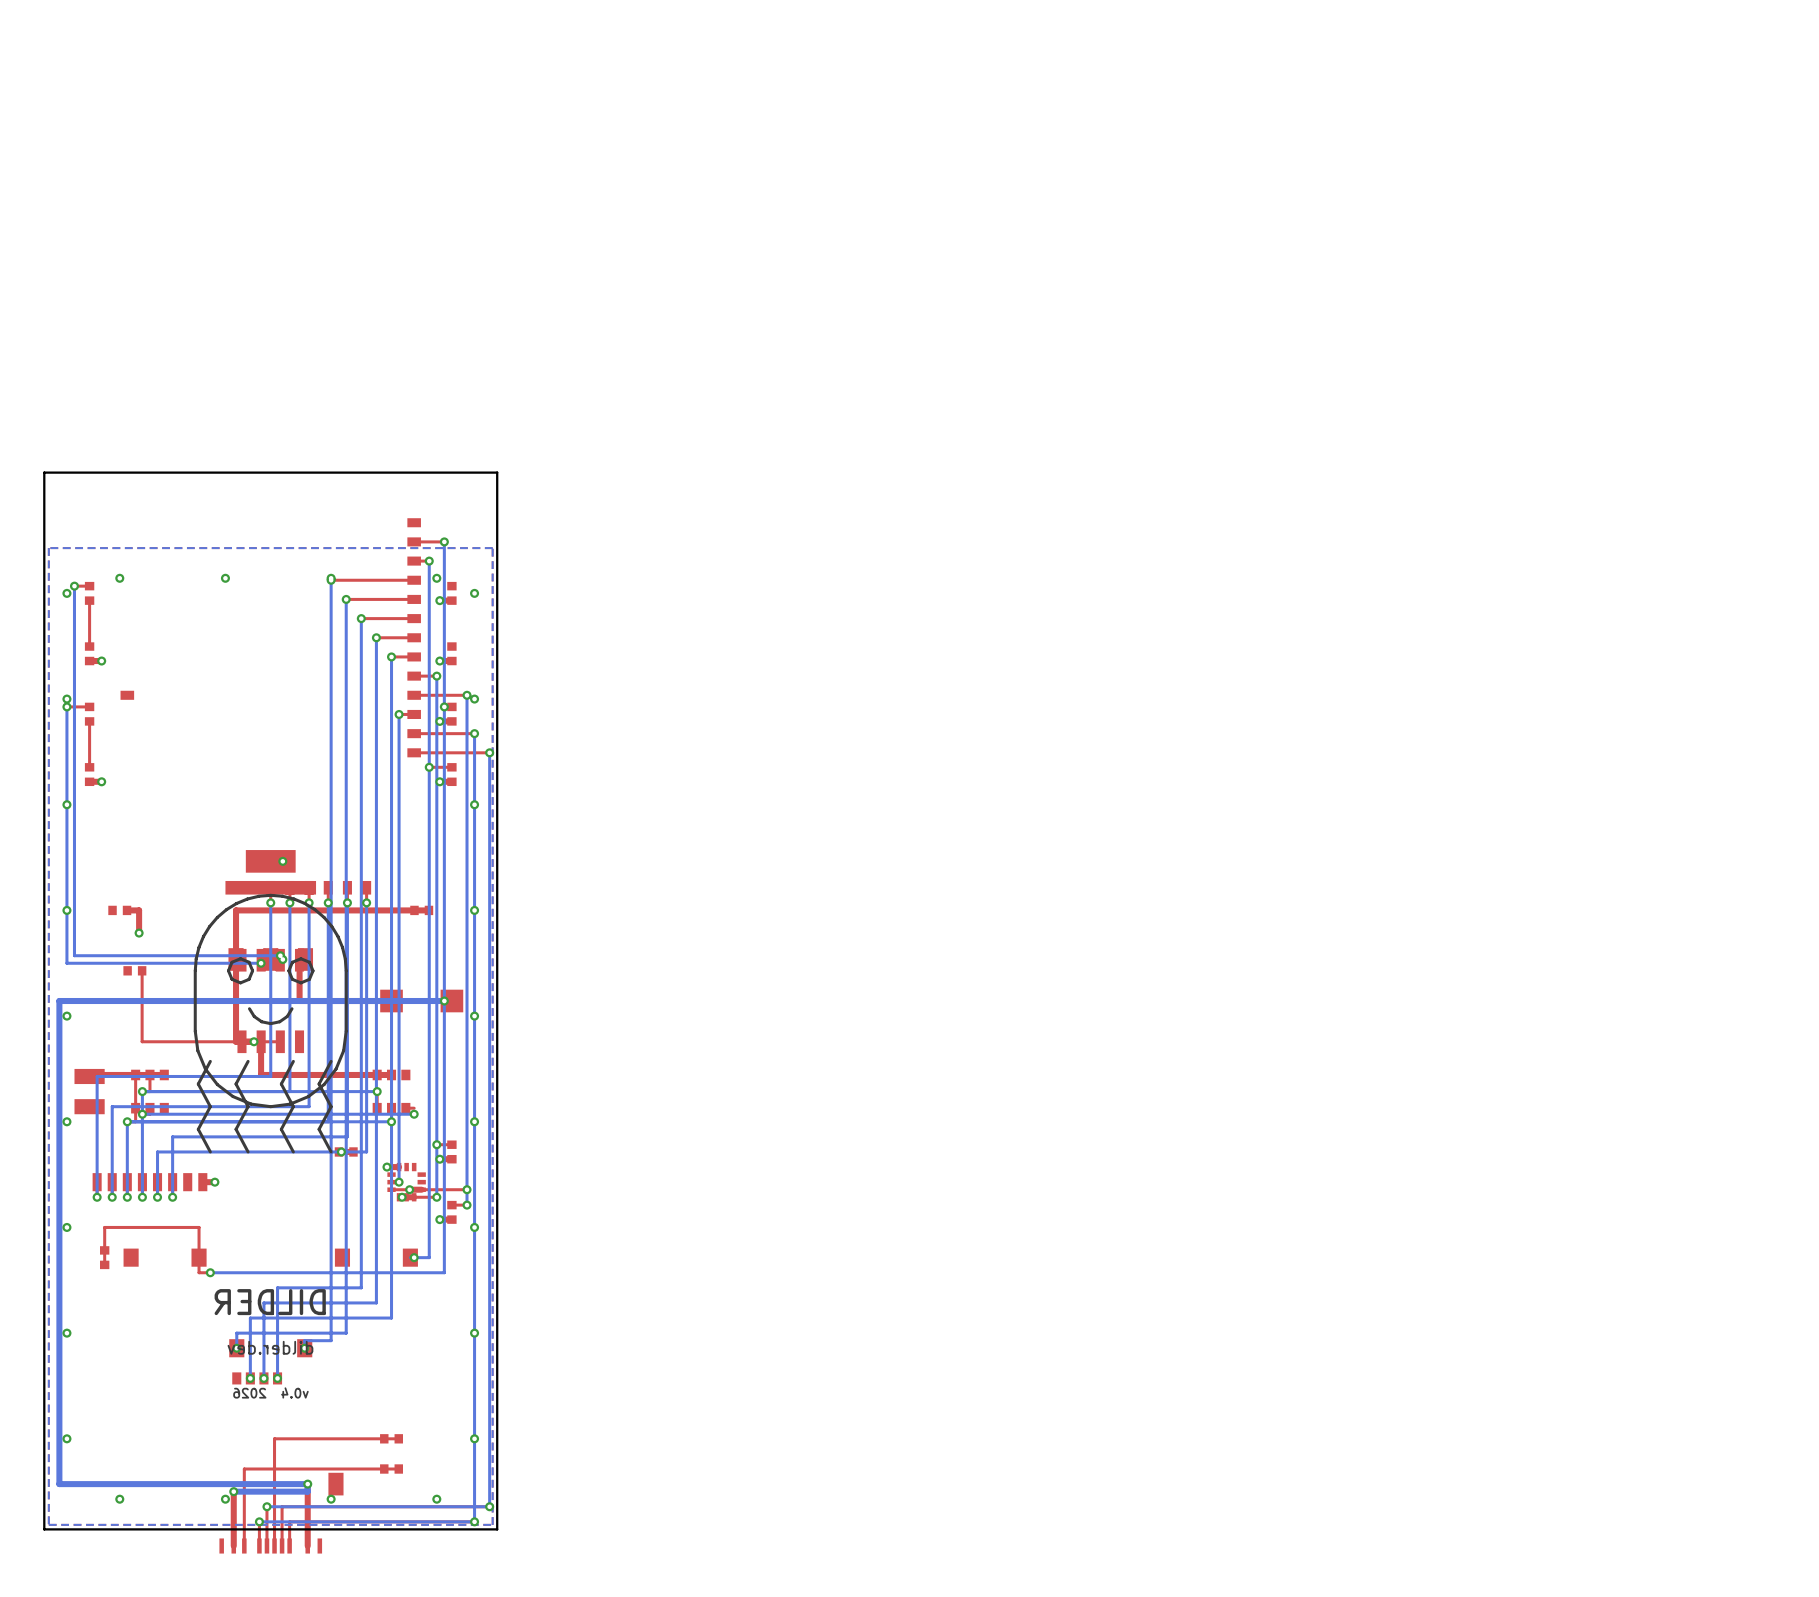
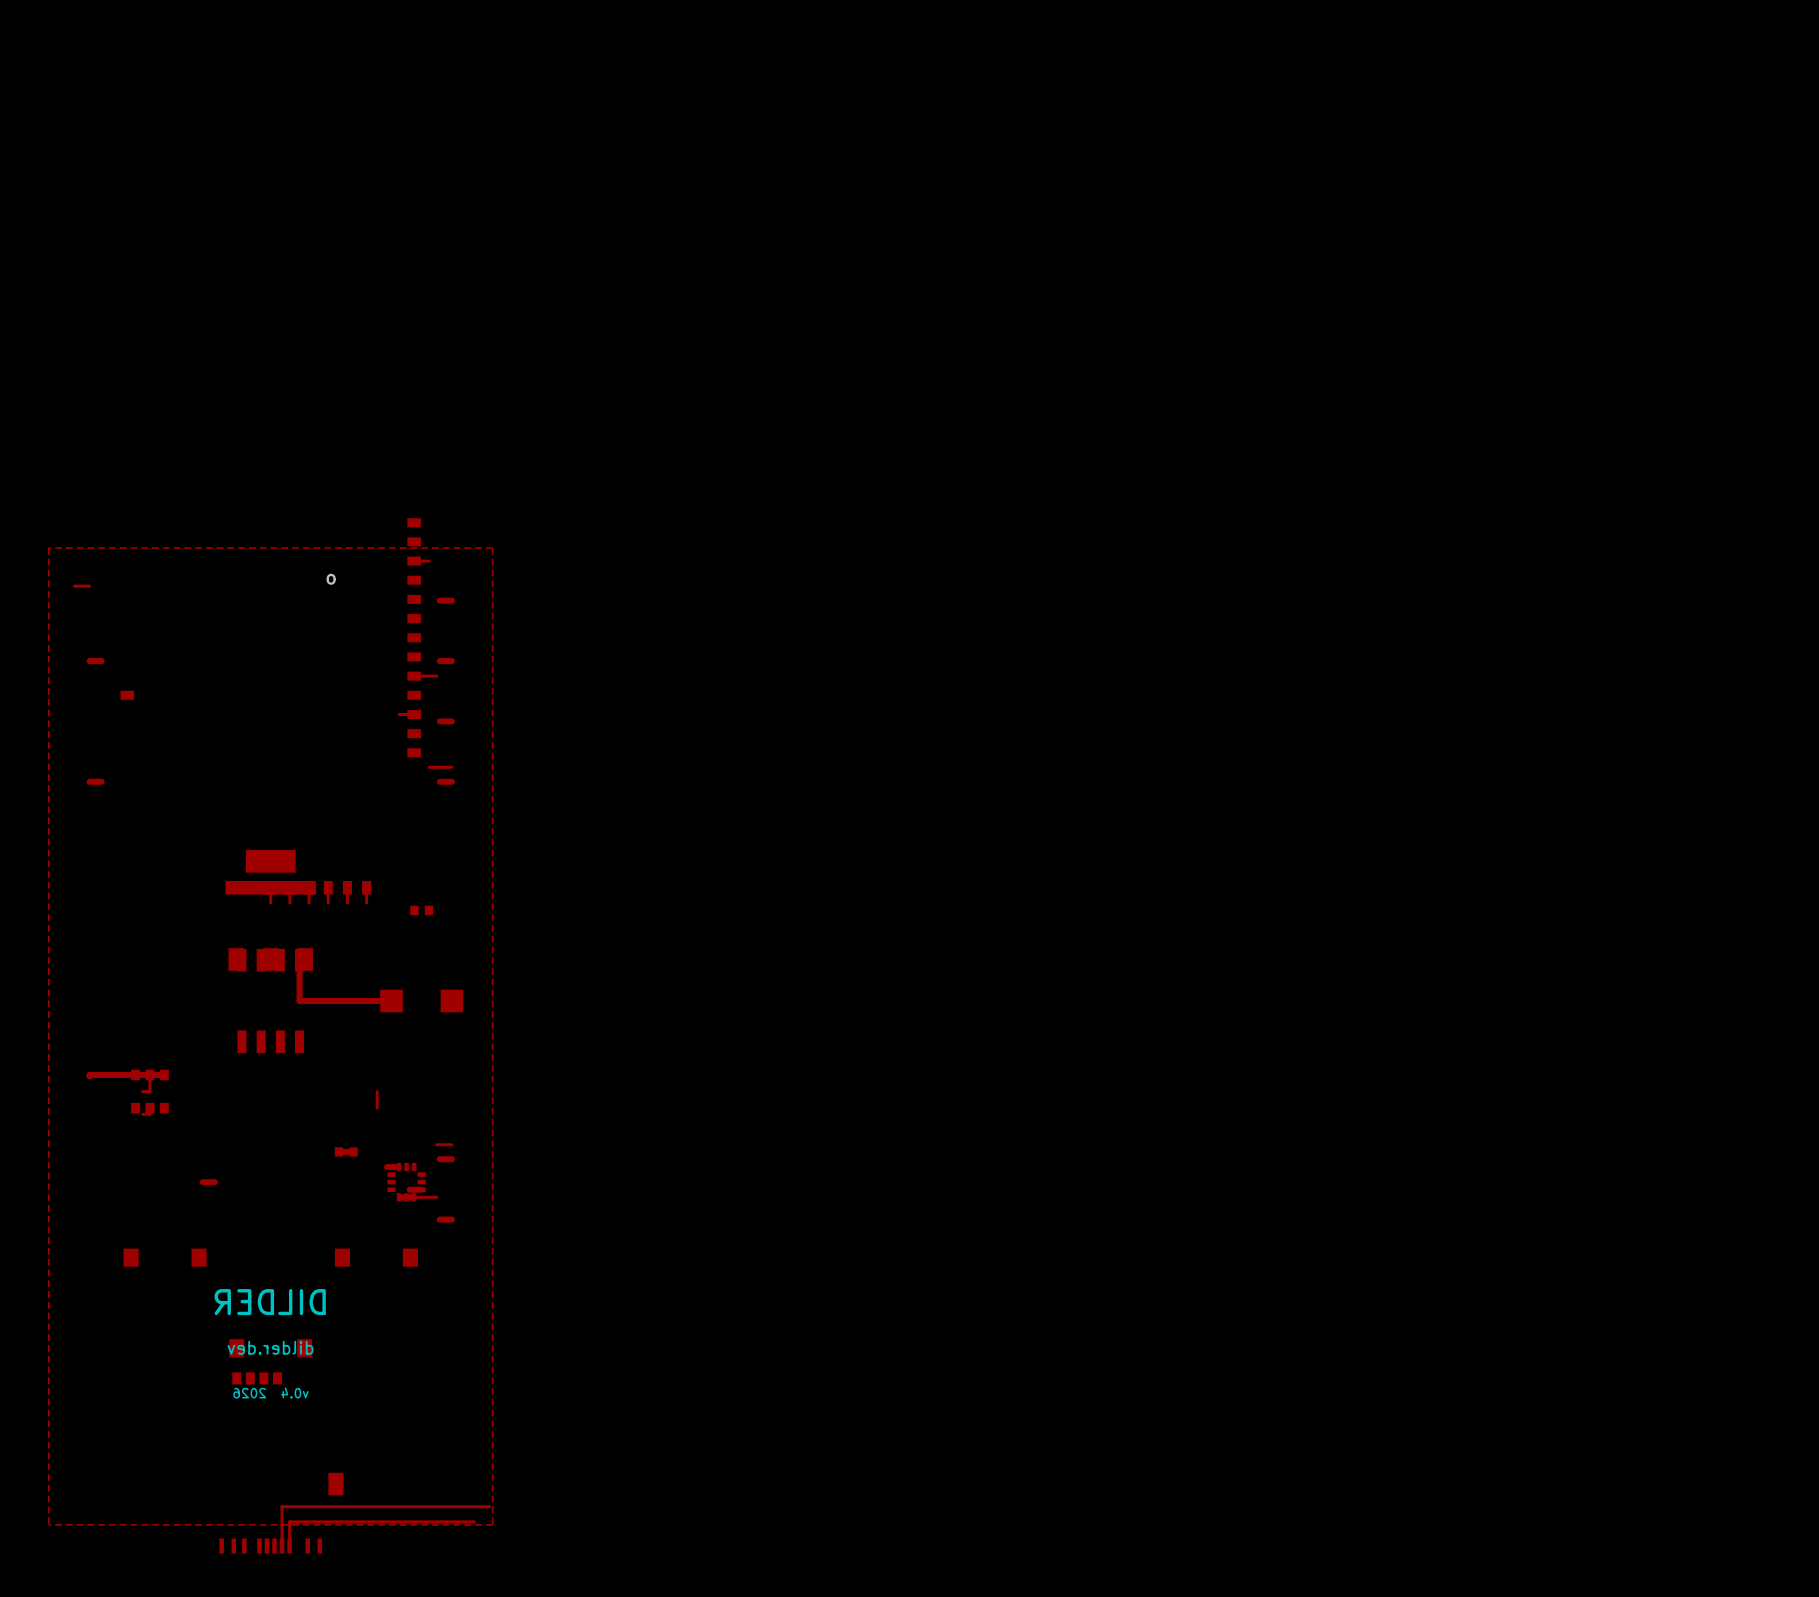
board edge: (497, 472) (44, 472) (44, 1529) (497, 1529) (497, 472) -> none
top track: (444, 541) (414, 541) -> none
bottom track: (444, 541) (444, 1272) (210, 1272) -> none
via: (444, 541) -> none
bottom zone outline: (492, 548) (48, 548) (48, 1524) (492, 1524) (492, 548) -> none
bottom track: (429, 561) (429, 1257) (410, 1257) -> none
via: (429, 561) -> none
via: (119, 578) -> none
via: (225, 578) -> none
via: (436, 578) -> none
bottom track: (331, 580) (331, 1340) (304, 1340) (304, 1348) -> none
top track: (414, 580) (331, 580) -> none
bottom track: (74, 586) (74, 955) (280, 955) -> none
via: (74, 586) -> none
via: (66, 593) -> none
part: (89, 593) -> none
part: (451, 593) -> none
via: (474, 593) -> none
bottom track: (346, 599) (346, 1333) (236, 1333) (236, 1348) -> none
via: (346, 599) -> none
top track: (414, 599) (346, 599) -> none
top track: (89, 600) (89, 646) -> none
via: (439, 600) -> none
bottom track: (361, 618) (361, 1287) (277, 1287) (277, 1378) -> none
via: (361, 618) -> none
top track: (414, 618) (361, 618) -> none
bottom track: (376, 637) (376, 1302) (263, 1302) (263, 1378) -> none
via: (376, 637) -> none
top track: (414, 637) (376, 637) -> none
part: (89, 653) -> none
part: (451, 653) -> none
bottom track: (391, 656) (391, 1318) (250, 1318) (250, 1378) -> none
via: (391, 656) -> none
top track: (414, 656) (391, 656) -> none
via: (101, 661) -> none
via: (439, 661) -> none
bottom track: (436, 676) (436, 1197) -> none
via: (436, 676) -> none
top track: (467, 695) (414, 695) -> none
bottom track: (467, 695) (467, 1205) -> none
via: (467, 695) -> none
via: (66, 699) -> none
via: (474, 699) -> none
bottom track: (66, 706) (66, 963) (261, 963) -> none
via: (66, 706) -> none
top track: (89, 706) (66, 706) -> none
via: (444, 706) -> none
part: (89, 714) -> none
bottom track: (399, 714) (399, 1182) -> none
via: (399, 714) -> none
part: (451, 714) -> none
top track: (89, 721) (89, 767) -> none
via: (439, 721) -> none
top track: (474, 733) (414, 733) -> none
bottom track: (474, 733) (474, 1521) (259, 1521) -> none
via: (474, 733) -> none
top track: (489, 752) (414, 752) -> none
bottom track: (489, 752) (489, 1506) (266, 1506) -> none
via: (489, 752) -> none
via: (429, 767) -> none
part: (89, 774) -> none
part: (451, 774) -> none
via: (101, 781) -> none
via: (439, 781) -> none
via: (66, 804) -> none
via: (474, 804) -> none
via: (282, 861) -> none
line: (270, 895) (282, 896) (305, 903) (324, 917) (338, 936) (345, 959) (346, 970) (346, 1031) (343, 1050) (336, 1068) (324, 1084) (308, 1096) (290, 1104) (270, 1106) (251, 1104) (233, 1096) (217, 1084) (205, 1068) (197, 1050) (195, 1031) (196, 959) (203, 936) (217, 917) (236, 903) (258, 896) (270, 895) -> none
bottom track: (270, 902) (270, 1076) (97, 1076) (97, 1197) -> none
via: (270, 902) -> none
bottom track: (289, 902) (289, 1091) -> none
via: (289, 902) -> none
bottom track: (309, 902) (309, 1106) (112, 1106) (112, 1197) -> none
via: (309, 902) -> none
bottom track: (328, 902) (328, 1121) -> none
via: (328, 902) -> none
bottom track: (347, 902) (347, 1136) (172, 1136) (172, 1197) -> none
via: (347, 902) -> none
bottom track: (366, 902) (366, 1151) (157, 1151) (157, 1197) -> none
via: (366, 902) -> none
via: (66, 910) -> none
part: (119, 910) -> none
top track: (127, 910) (139, 910) (139, 933) -> none
top track: (428, 910) (236, 910) (236, 1041) (261, 1041) (261, 1074) (391, 1074) -> none
via: (474, 910) -> none
via: (139, 933) -> none
via: (280, 955) -> none
line: (240, 958) (249, 962) (252, 970) (249, 979) (240, 982) (232, 979) (228, 970) (232, 962) (240, 958) -> none
line: (300, 958) (309, 962) (313, 970) (309, 979) (300, 982) (292, 979) (288, 970) (292, 962) (300, 958) -> none
via: (282, 959) -> none
via: (261, 963) -> none
part: (134, 970) -> none
top track: (142, 970) (142, 1041) (280, 1041) -> none
bottom track: (444, 1001) (59, 1001) (59, 1484) (307, 1484) (307, 1491) (233, 1491) -> none
via: (444, 1001) -> none
line: (292, 1008) (287, 1016) (279, 1021) (270, 1023) (261, 1021) (254, 1016) (249, 1008) -> none
via: (66, 1016) -> none
via: (474, 1016) -> none
via: (253, 1041) -> none
line: (210, 1061) (198, 1084) (210, 1106) (198, 1129) (210, 1151) -> none
line: (248, 1061) (236, 1084) (248, 1106) (236, 1129) (248, 1151) -> none
line: (293, 1061) (281, 1084) (293, 1106) (281, 1129) (293, 1151) -> none
line: (331, 1061) (319, 1084) (331, 1106) (319, 1129) (331, 1151) -> none
top track: (135, 1074) (135, 1121) (127, 1121) -> none
part: (89, 1091) -> none
via: (142, 1091) -> none
bottom track: (377, 1091) (142, 1091) (142, 1197) -> none
via: (377, 1091) -> none
part: (391, 1091) -> none
top track: (414, 1108) (405, 1108) -> none
via: (142, 1114) -> none
bottom track: (414, 1114) (142, 1114) -> none
via: (414, 1114) -> none
via: (66, 1121) -> none
via: (127, 1121) -> none
bottom track: (391, 1121) (127, 1121) (127, 1197) -> none
via: (391, 1121) -> none
via: (474, 1121) -> none
via: (436, 1144) -> none
via: (341, 1151) -> none
part: (451, 1151) -> none
via: (439, 1159) -> none
via: (386, 1167) -> none
part: (149, 1182) -> none
via: (214, 1182) -> none
via: (399, 1182) -> none
via: (409, 1189) -> none
top track: (467, 1189) (391, 1189) -> none
via: (467, 1189) -> none
via: (97, 1197) -> none
via: (112, 1197) -> none
via: (127, 1197) -> none
via: (142, 1197) -> none
via: (157, 1197) -> none
via: (172, 1197) -> none
via: (402, 1197) -> none
via: (436, 1197) -> none
top track: (467, 1205) (451, 1205) -> none
via: (467, 1205) -> none
part: (451, 1212) -> none
via: (439, 1219) -> none
via: (66, 1227) -> none
via: (474, 1227) -> none
part: (104, 1257) -> none
via: (414, 1257) -> none
top track: (104, 1264) (104, 1227) (199, 1227) (199, 1272) (210, 1272) -> none
via: (210, 1272) -> none
via: (66, 1333) -> none
via: (474, 1333) -> none
via: (236, 1348) -> none
via: (304, 1348) -> none
via: (250, 1378) -> none
via: (263, 1378) -> none
via: (277, 1378) -> none
via: (66, 1438) -> none
part: (391, 1438) -> none
top track: (398, 1438) (274, 1438) (274, 1546) -> none
via: (474, 1438) -> none
part: (391, 1469) -> none
top track: (398, 1469) (244, 1469) (244, 1546) -> none
top track: (307, 1484) (307, 1546) -> none
via: (307, 1484) -> none
top track: (233, 1491) (233, 1546) -> none
via: (233, 1491) -> none
via: (119, 1499) -> none
via: (225, 1499) -> none
via: (331, 1499) -> none
via: (436, 1499) -> none
top track: (266, 1506) (266, 1546) -> none
via: (266, 1506) -> none
via: (489, 1506) -> none
top track: (259, 1521) (259, 1546) -> none
via: (259, 1521) -> none
via: (474, 1521) -> none

